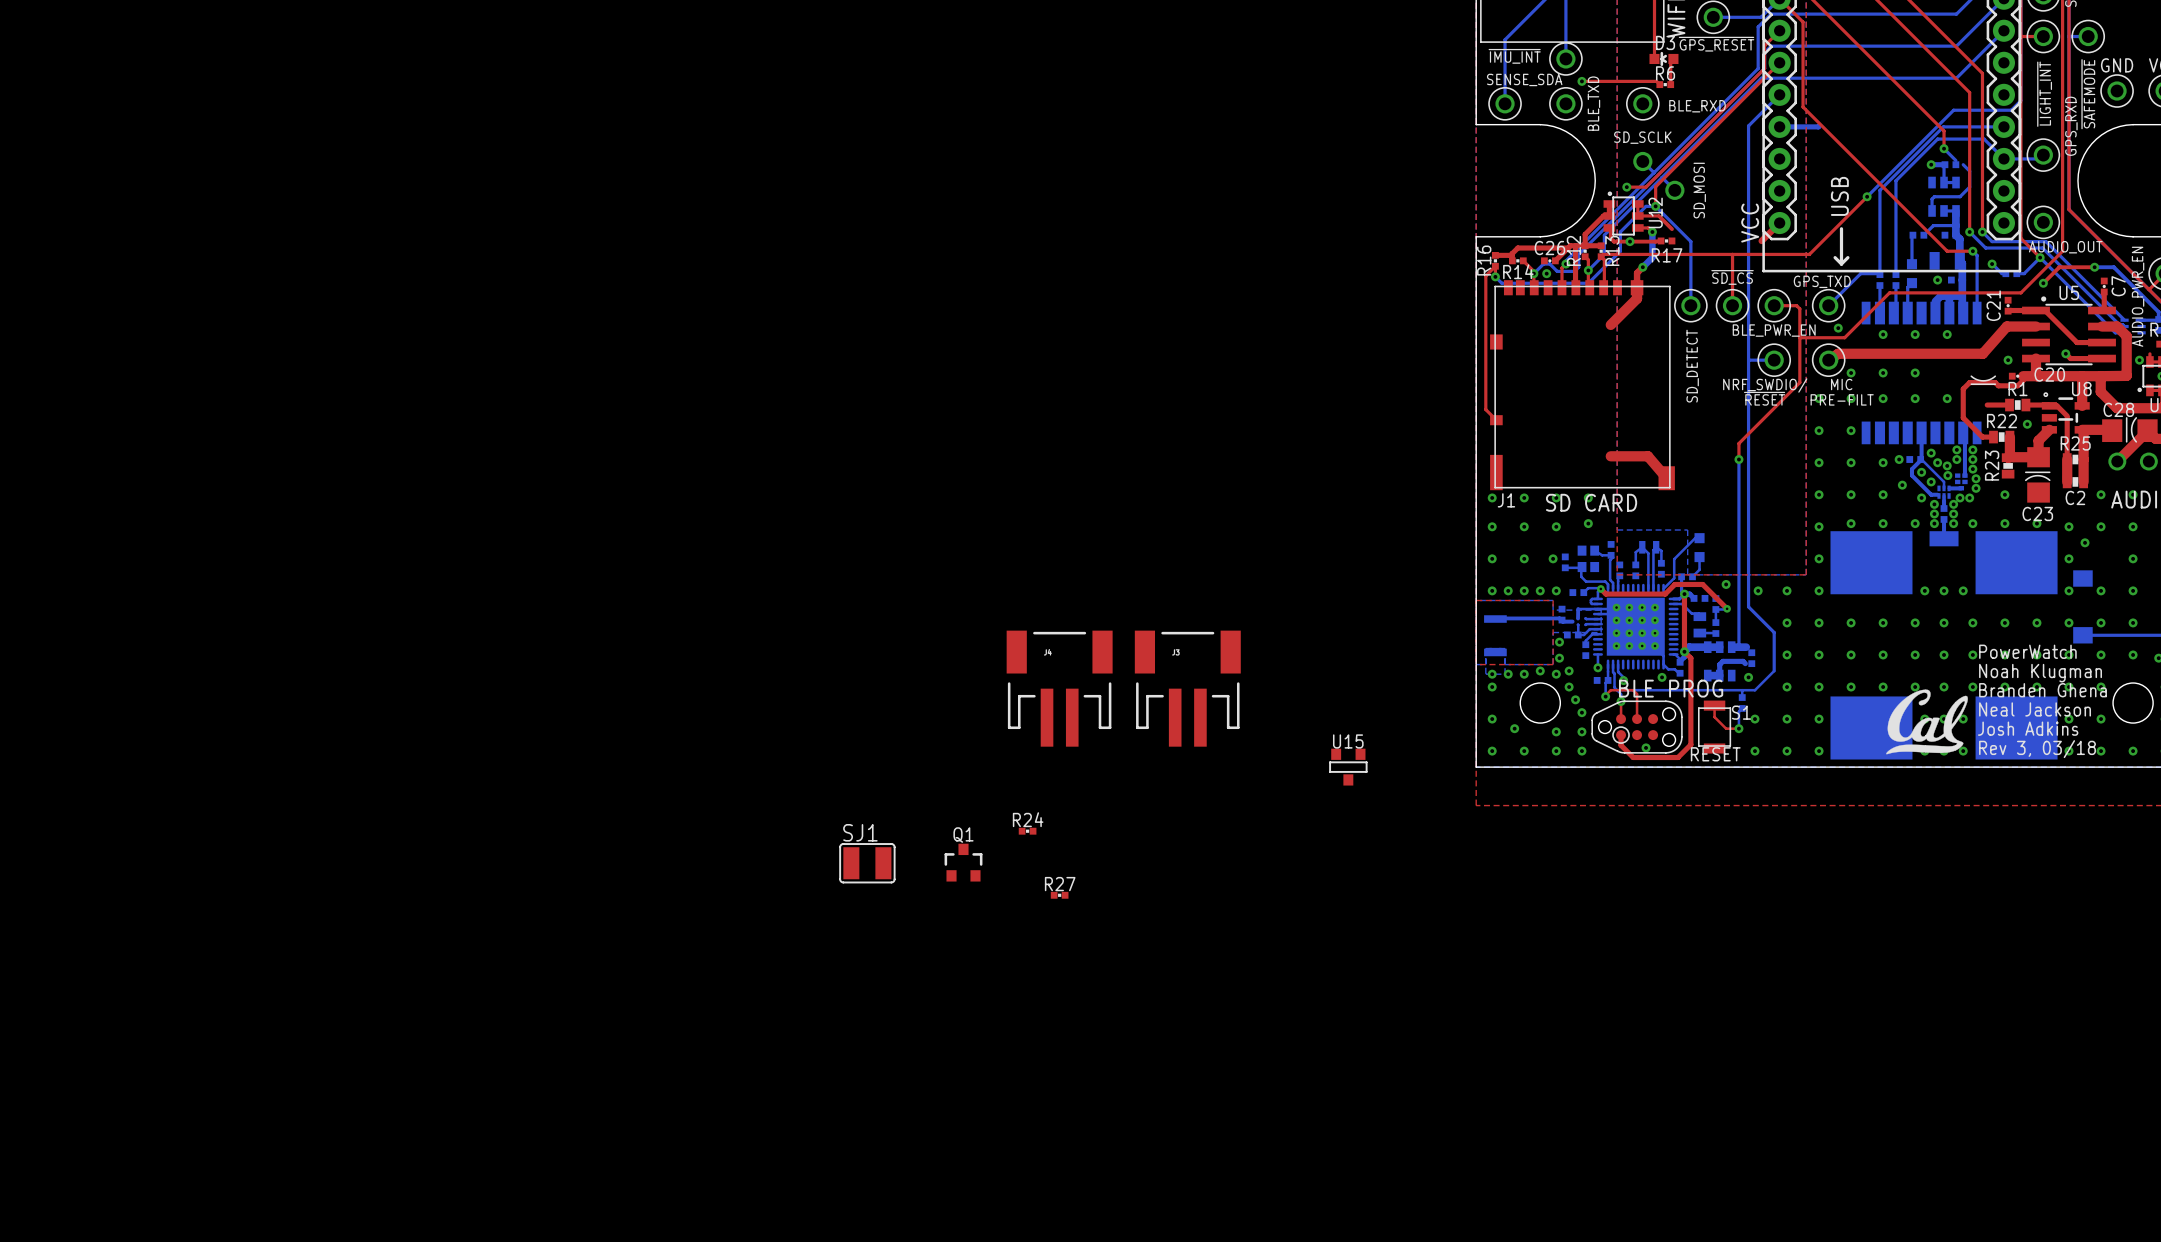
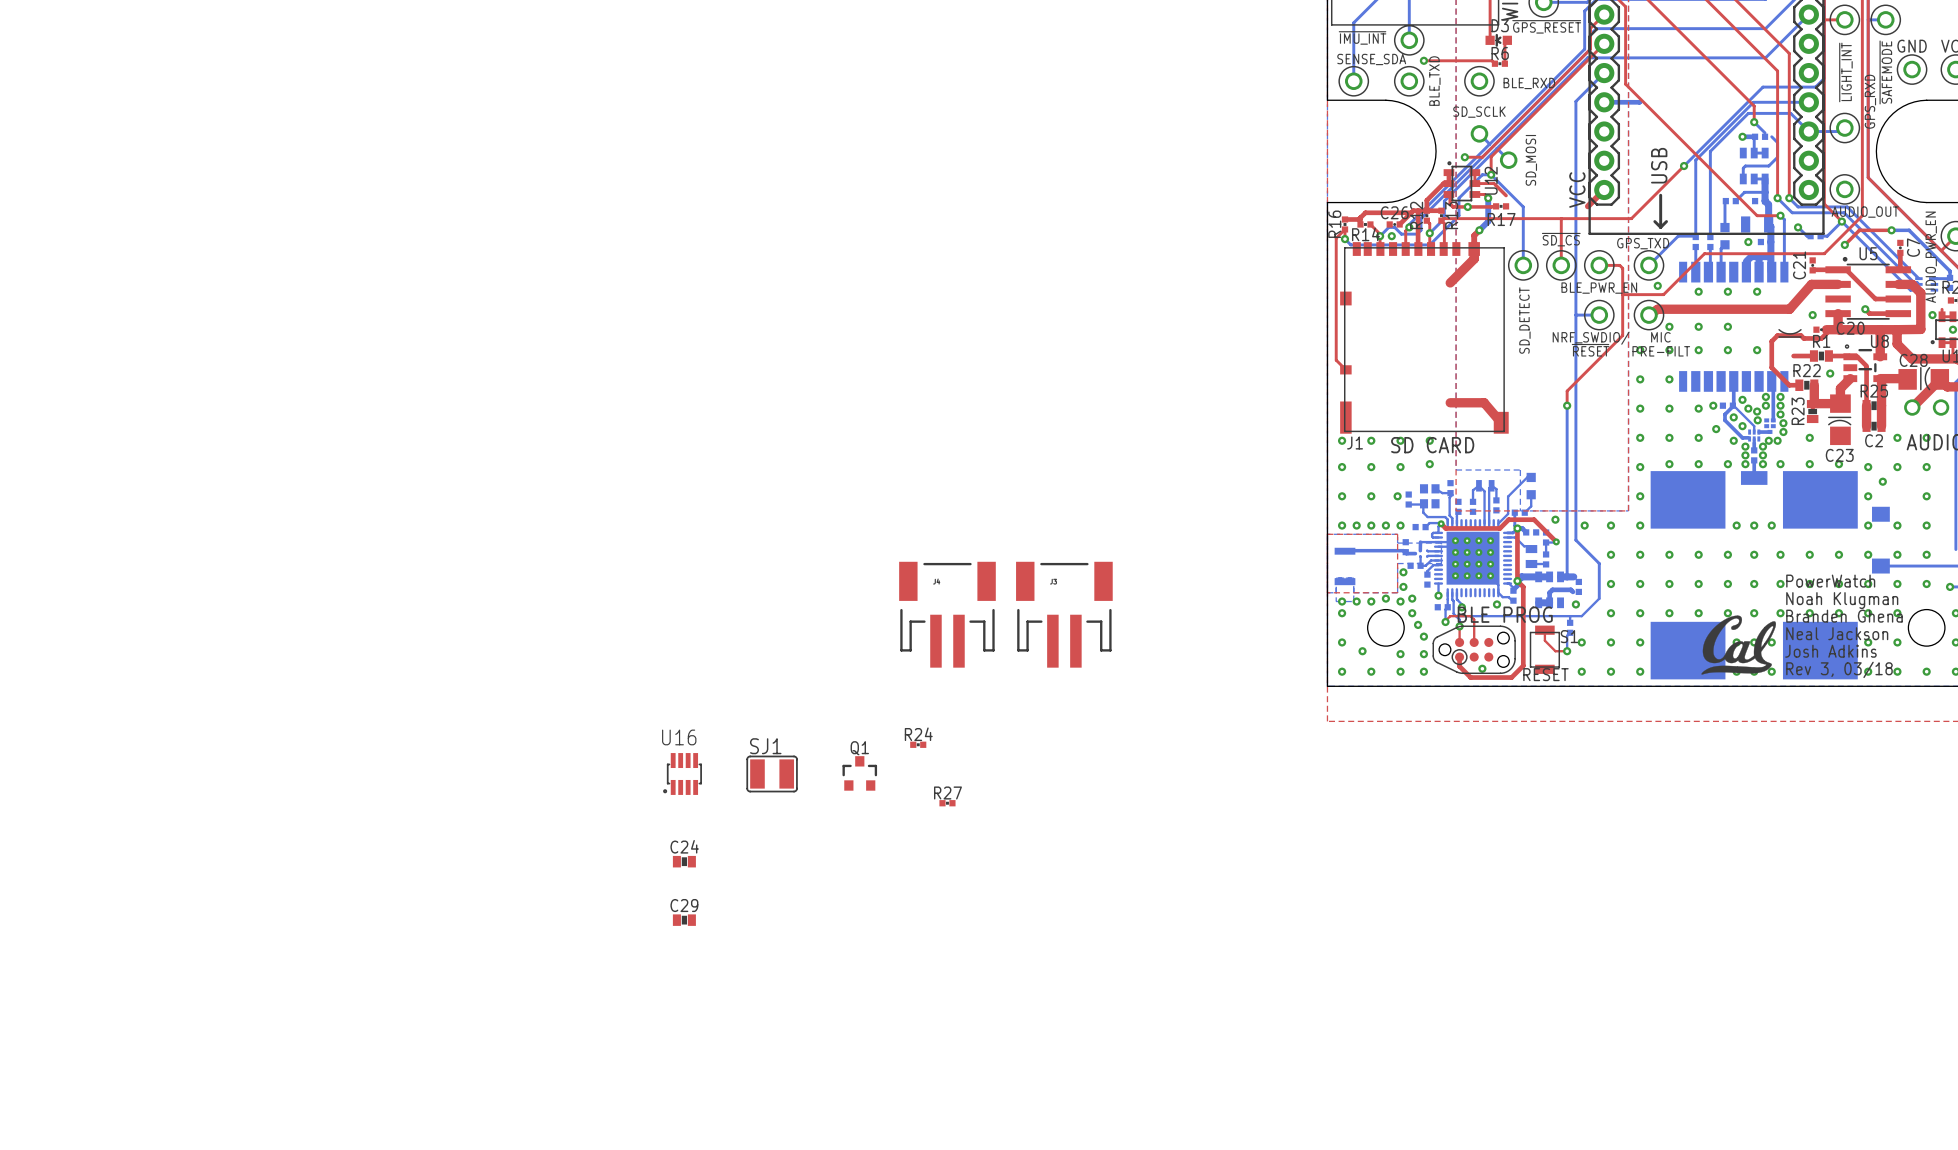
U15: (1348, 767) -> none
U16: none -> (682, 773)
C24: none -> (684, 861)
C29: none -> (684, 920)

